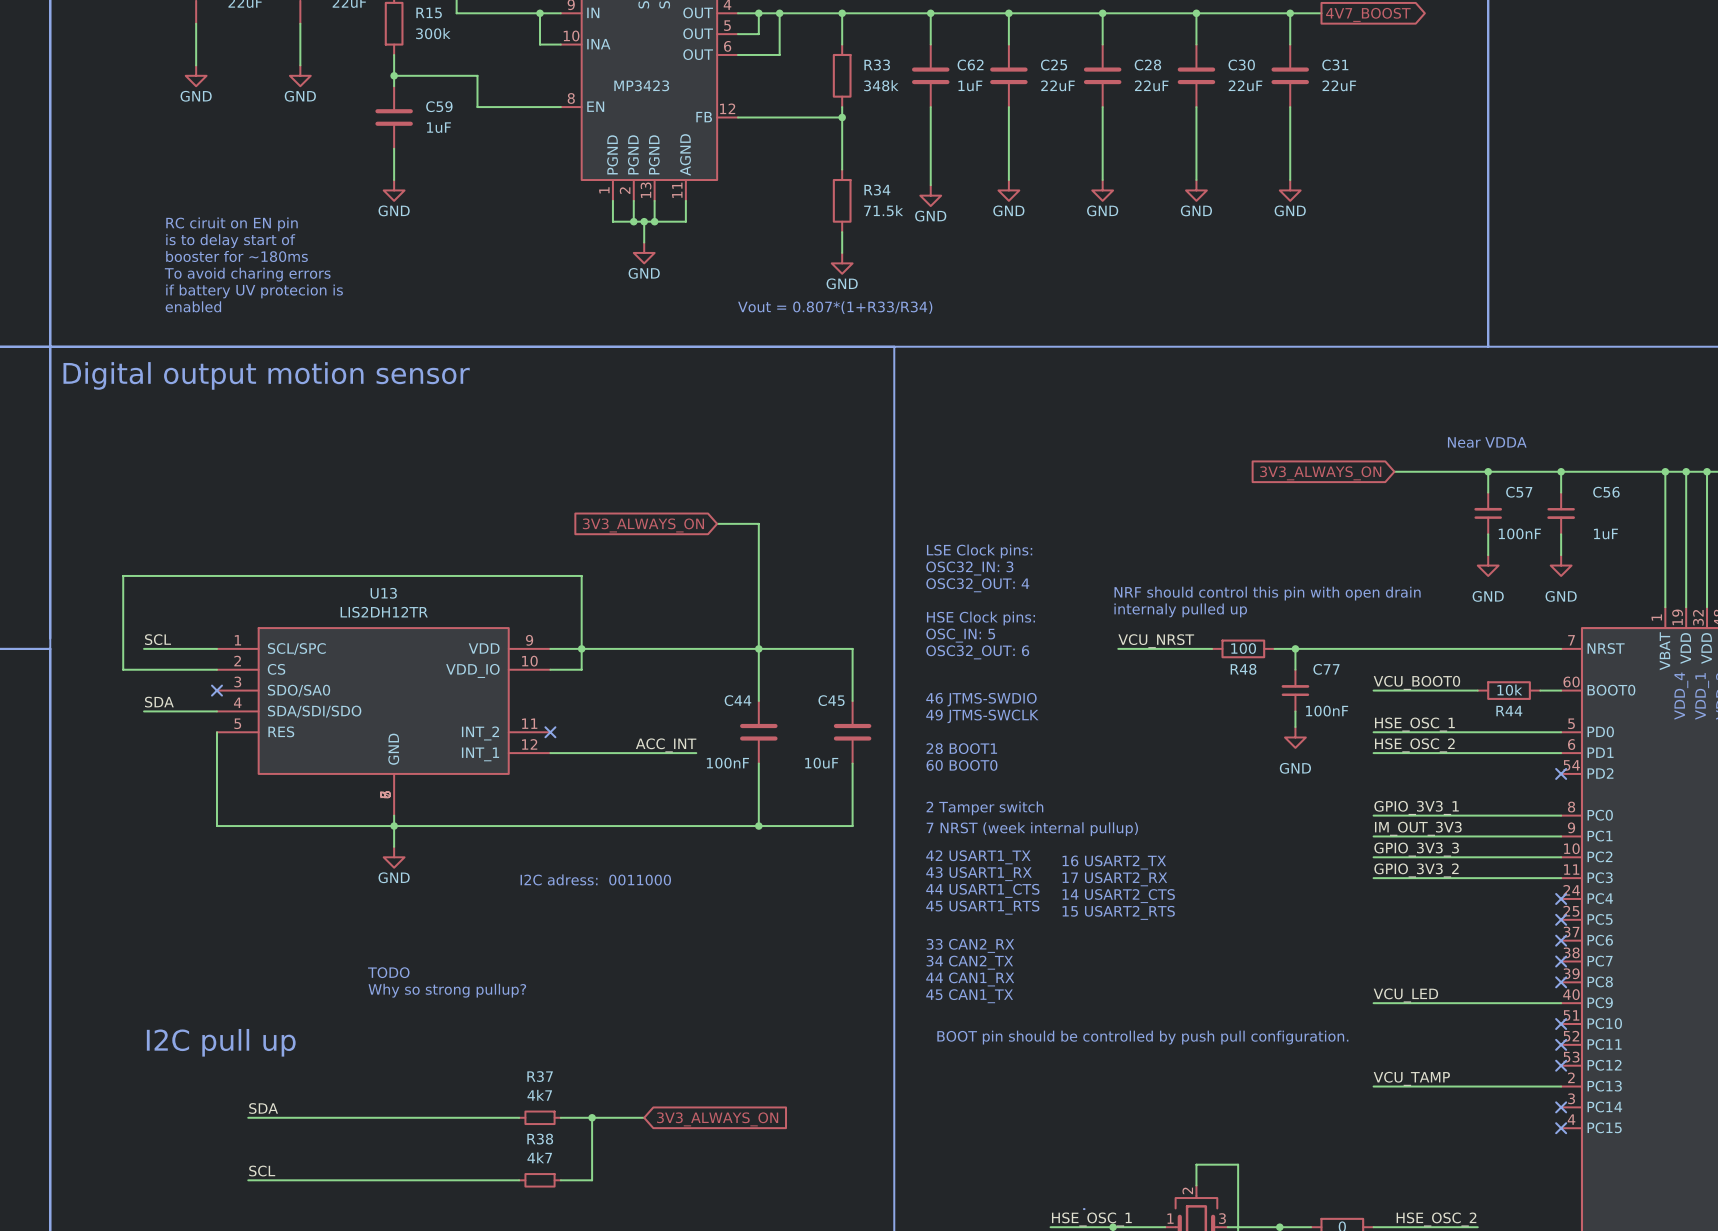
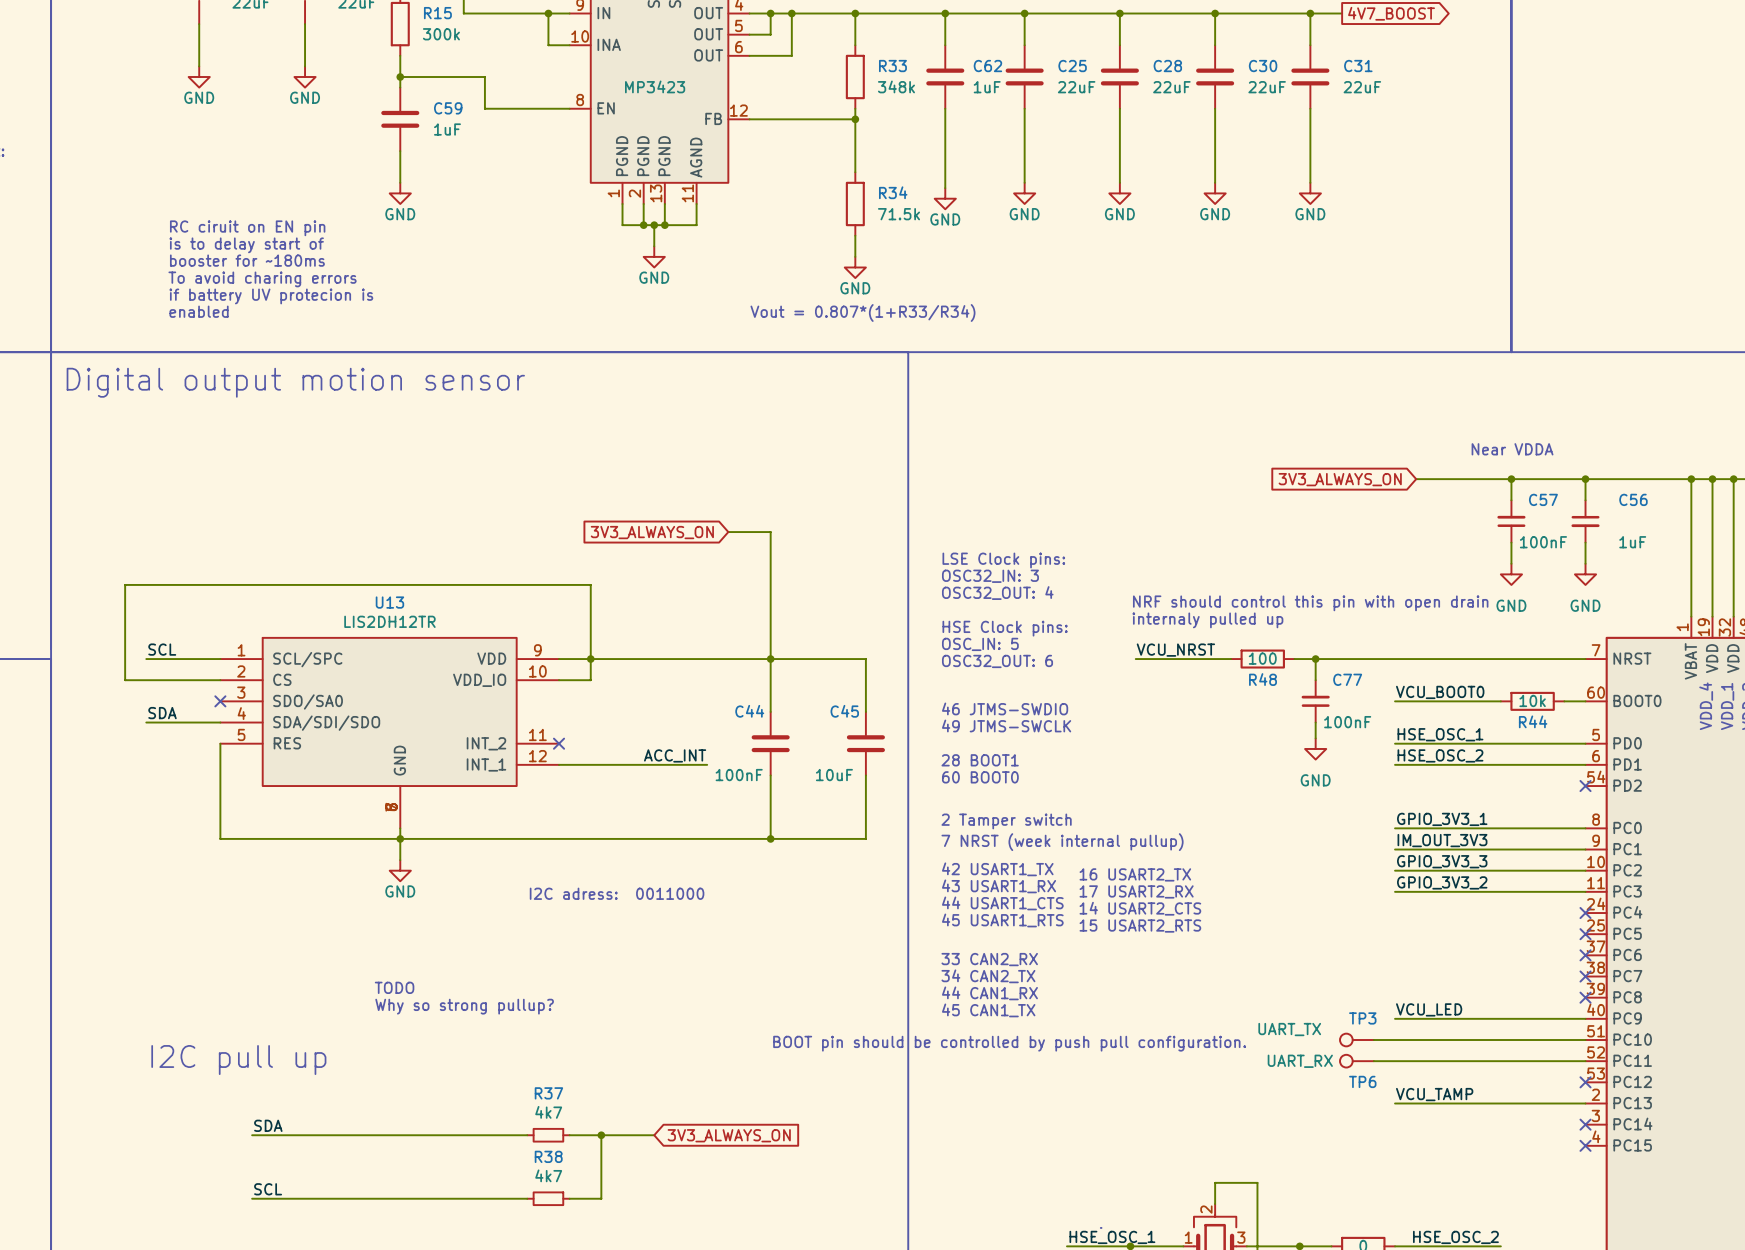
TP3: none -> UART_TX (1356, 1040)
wire: none -> (1373, 1040) (1585, 1040)
no-connect mark: (1561, 1024) -> none
text position: BOOT pin should be controlled by push pull configuration. (1142, 1037) -> BOOT pin should be controlled by push pull configuration. (1009, 1043)
TP6: none -> UART_RX (1356, 1061)
wire: none -> (1373, 1061) (1585, 1061)
no-connect mark: (1561, 1044) -> none

